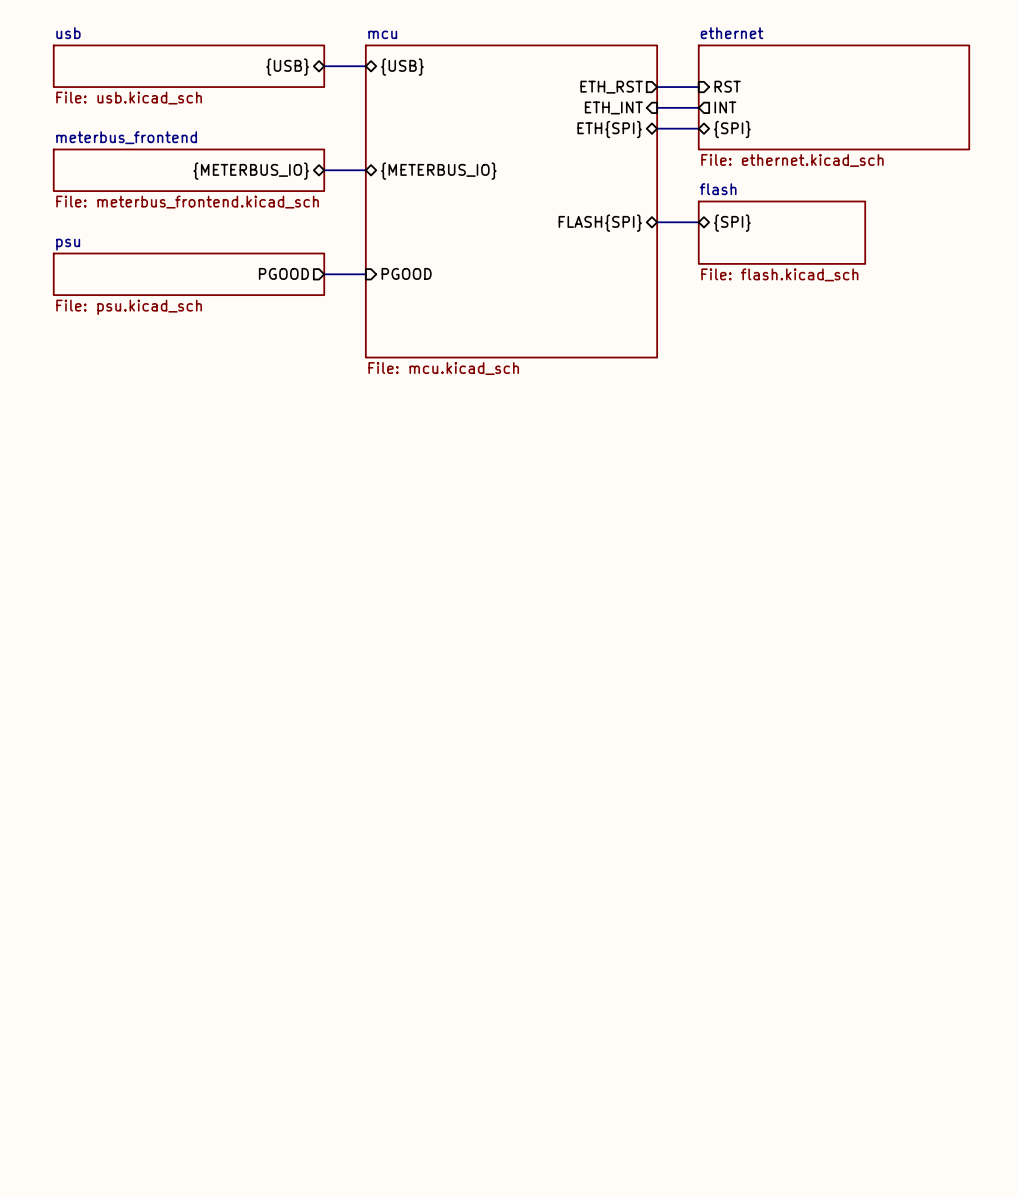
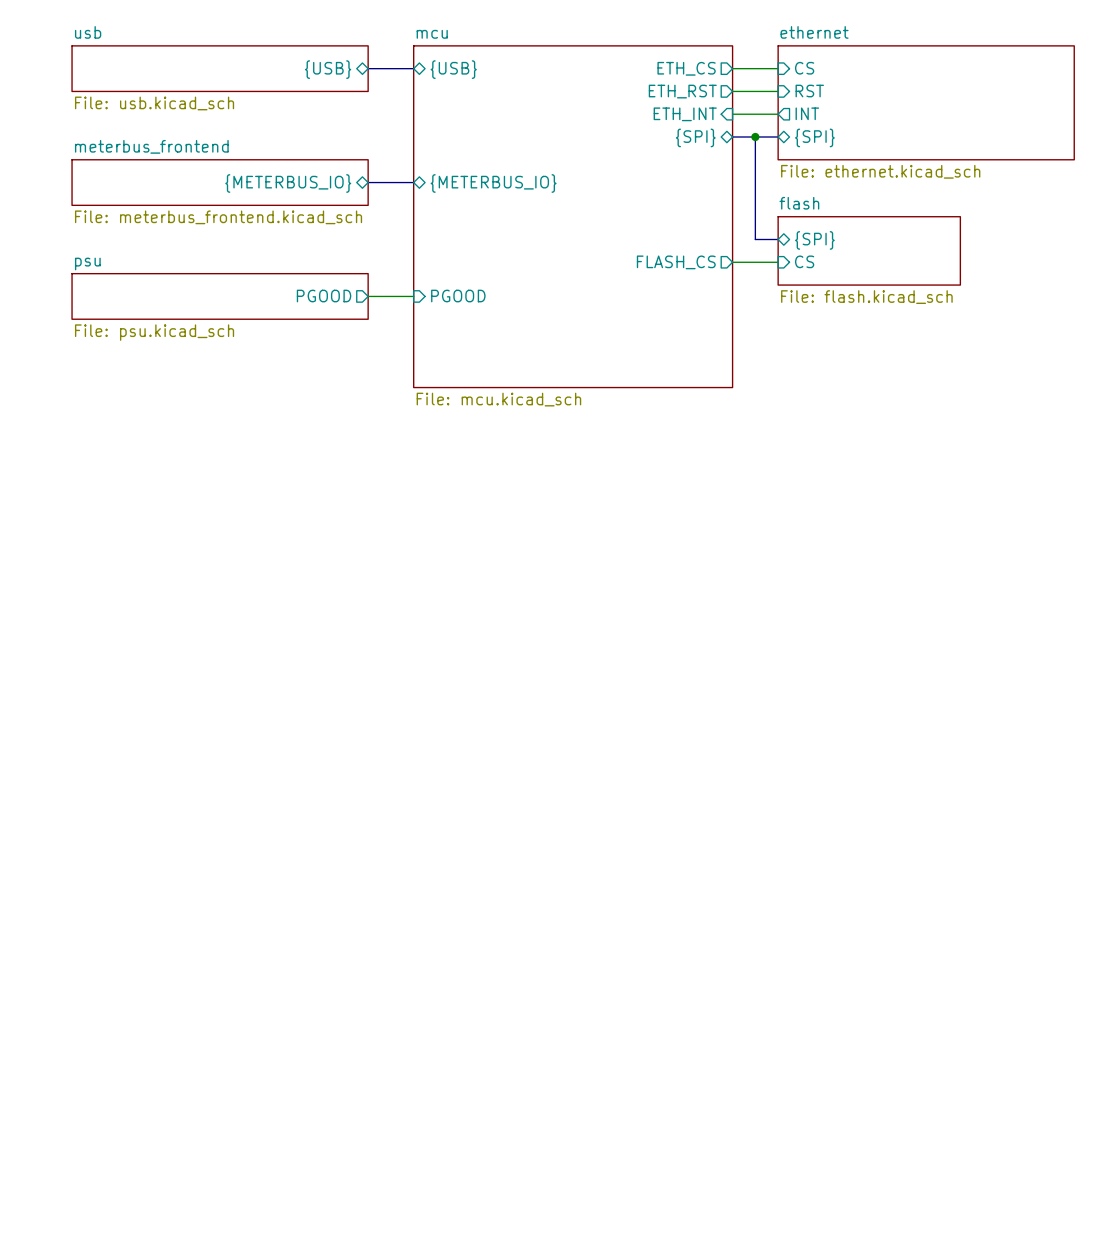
sheet pin: none -> CS (804, 68)
sheet pin: none -> ETH_CS (686, 68)
wire: none -> (732, 68) (778, 68)
junction: none -> (755, 137)
sheet pin: ETH{SPI} (609, 129) -> {SPI} (695, 137)
bus: (657, 222) (677, 222) -> (755, 137) (755, 239)
sheet pin shape: bidirectional (600, 223) -> output (676, 262)
sheet pin: FLASH{SPI} (600, 223) -> FLASH_CS (676, 262)
sheet pin: none -> CS (804, 261)
wire: none -> (732, 262) (778, 262)

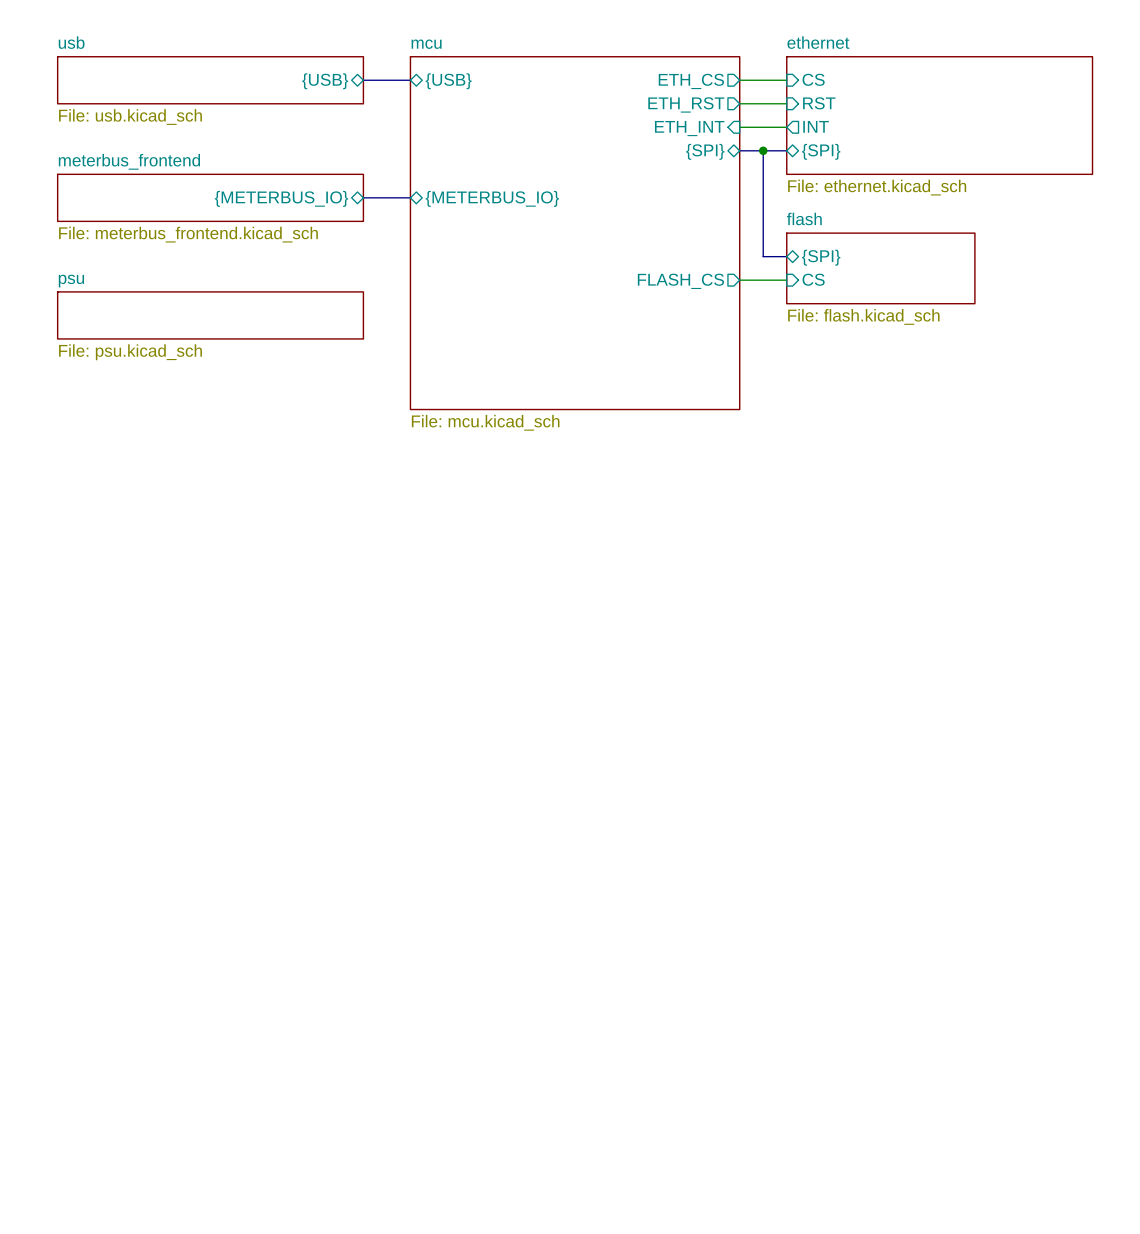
sheet pin: PGOOD (324, 296) -> none
wire: (368, 296) (413, 296) -> none
sheet pin: PGOOD (458, 296) -> none

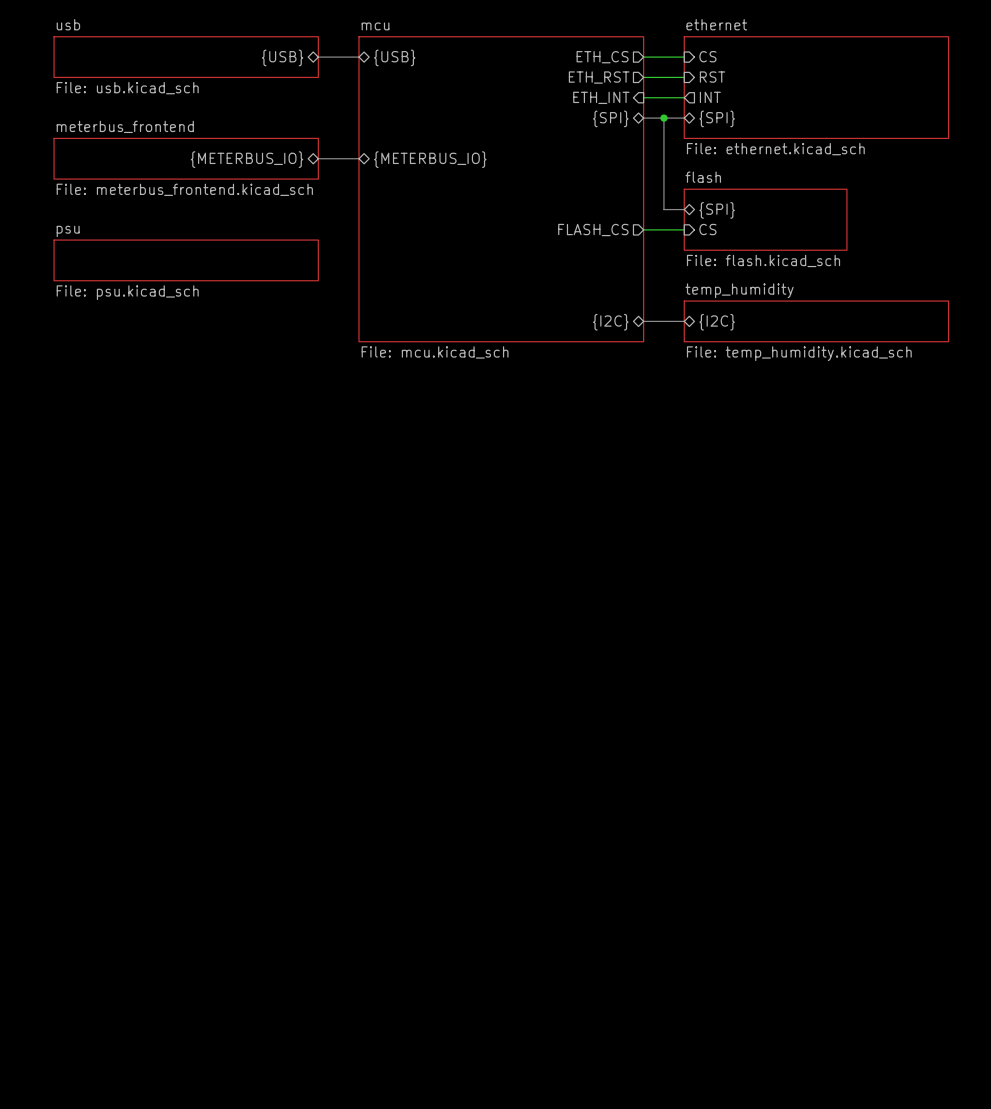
bus: none -> (643, 321) (684, 321)
sheet temp_humidity: none -> File: temp_humidity.kicad_sch (816, 321)
sheet pin: none -> {I2C} (610, 322)
sheet pin: none -> {I2C} (717, 322)

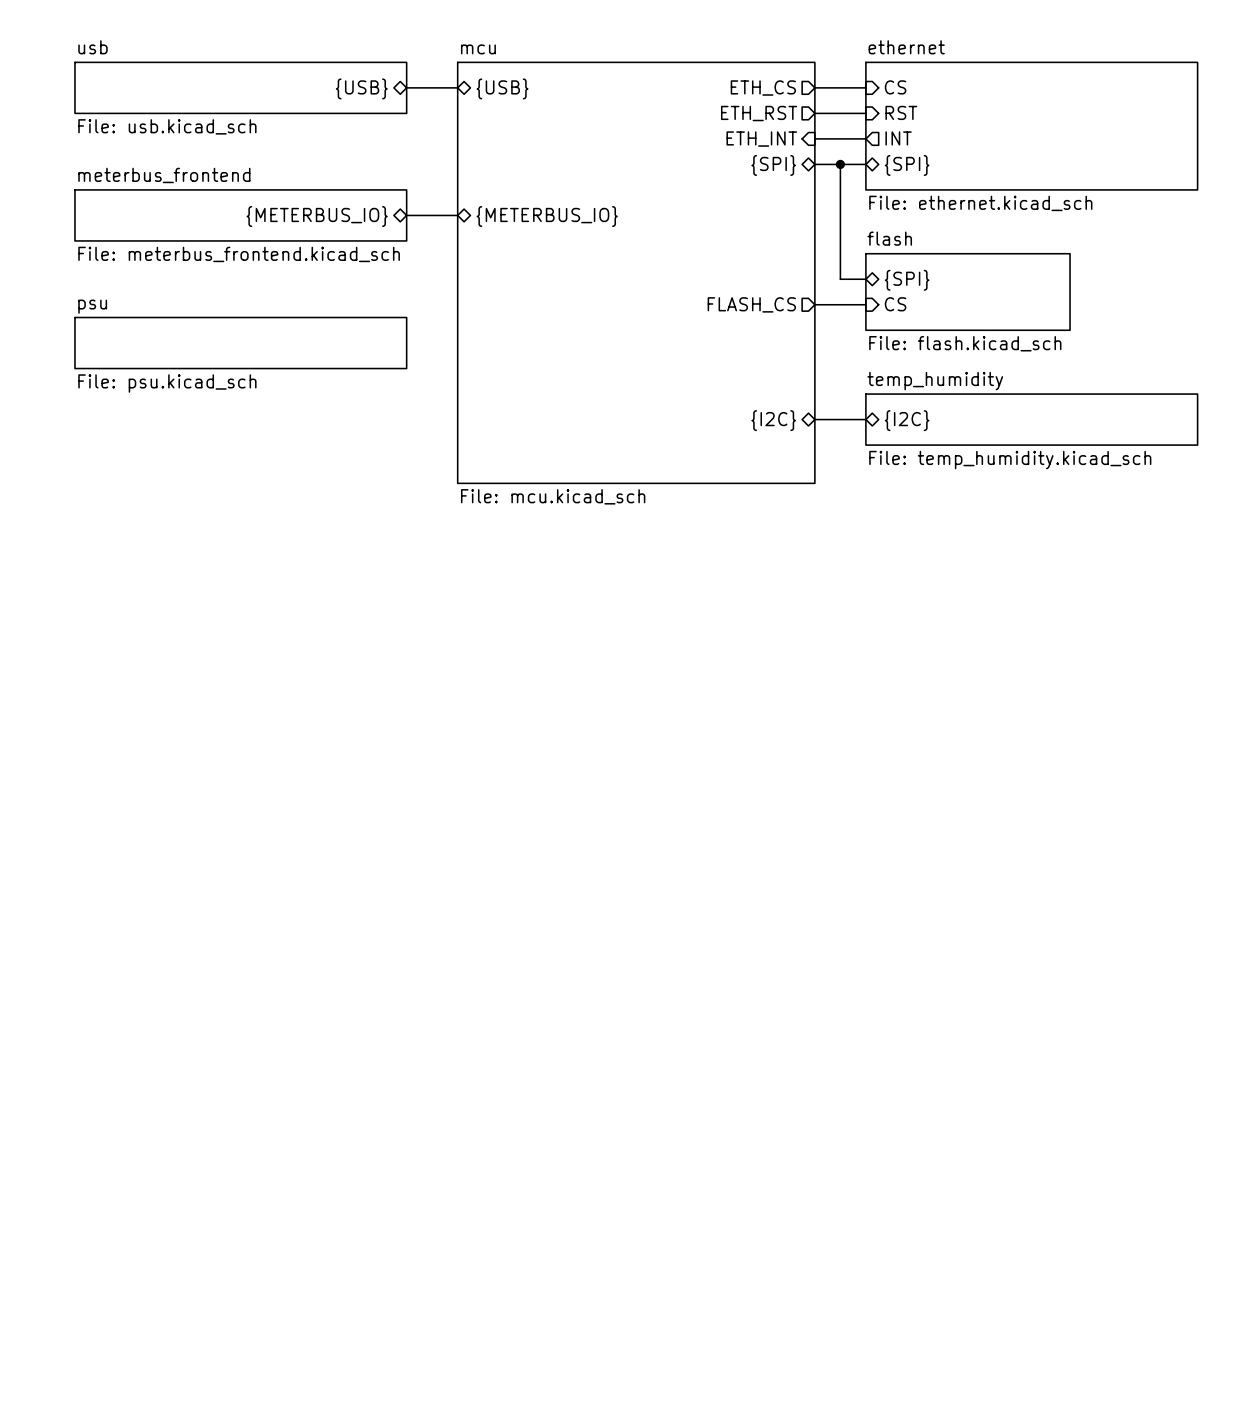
sheet mcu: File: mcu.kicad_sch (501, 189) -> none
sheet mcu: none -> File: mcu.kicad_sch (636, 272)

